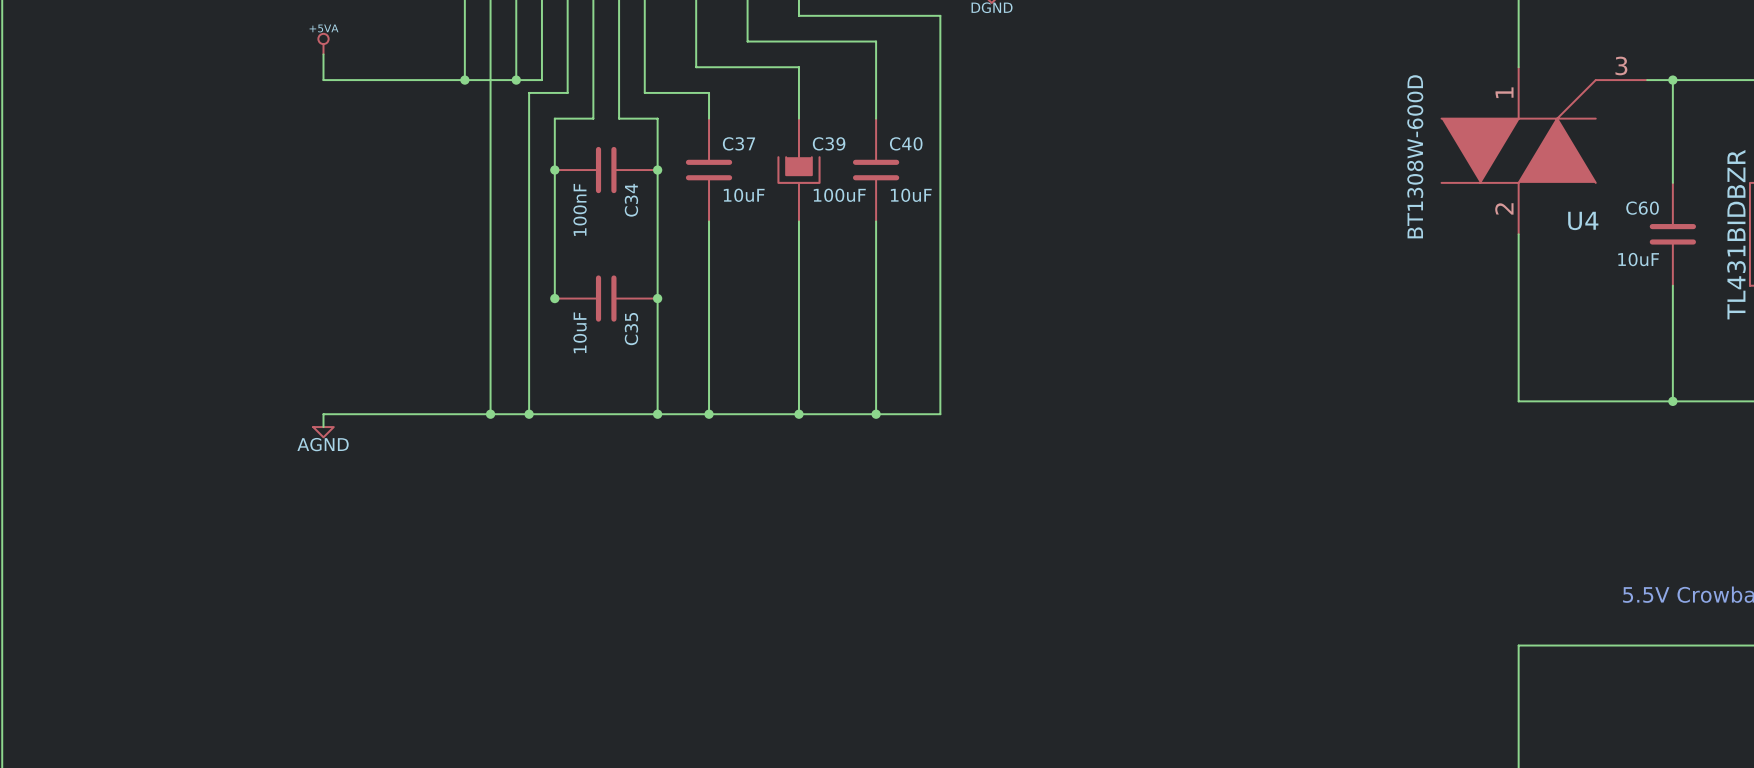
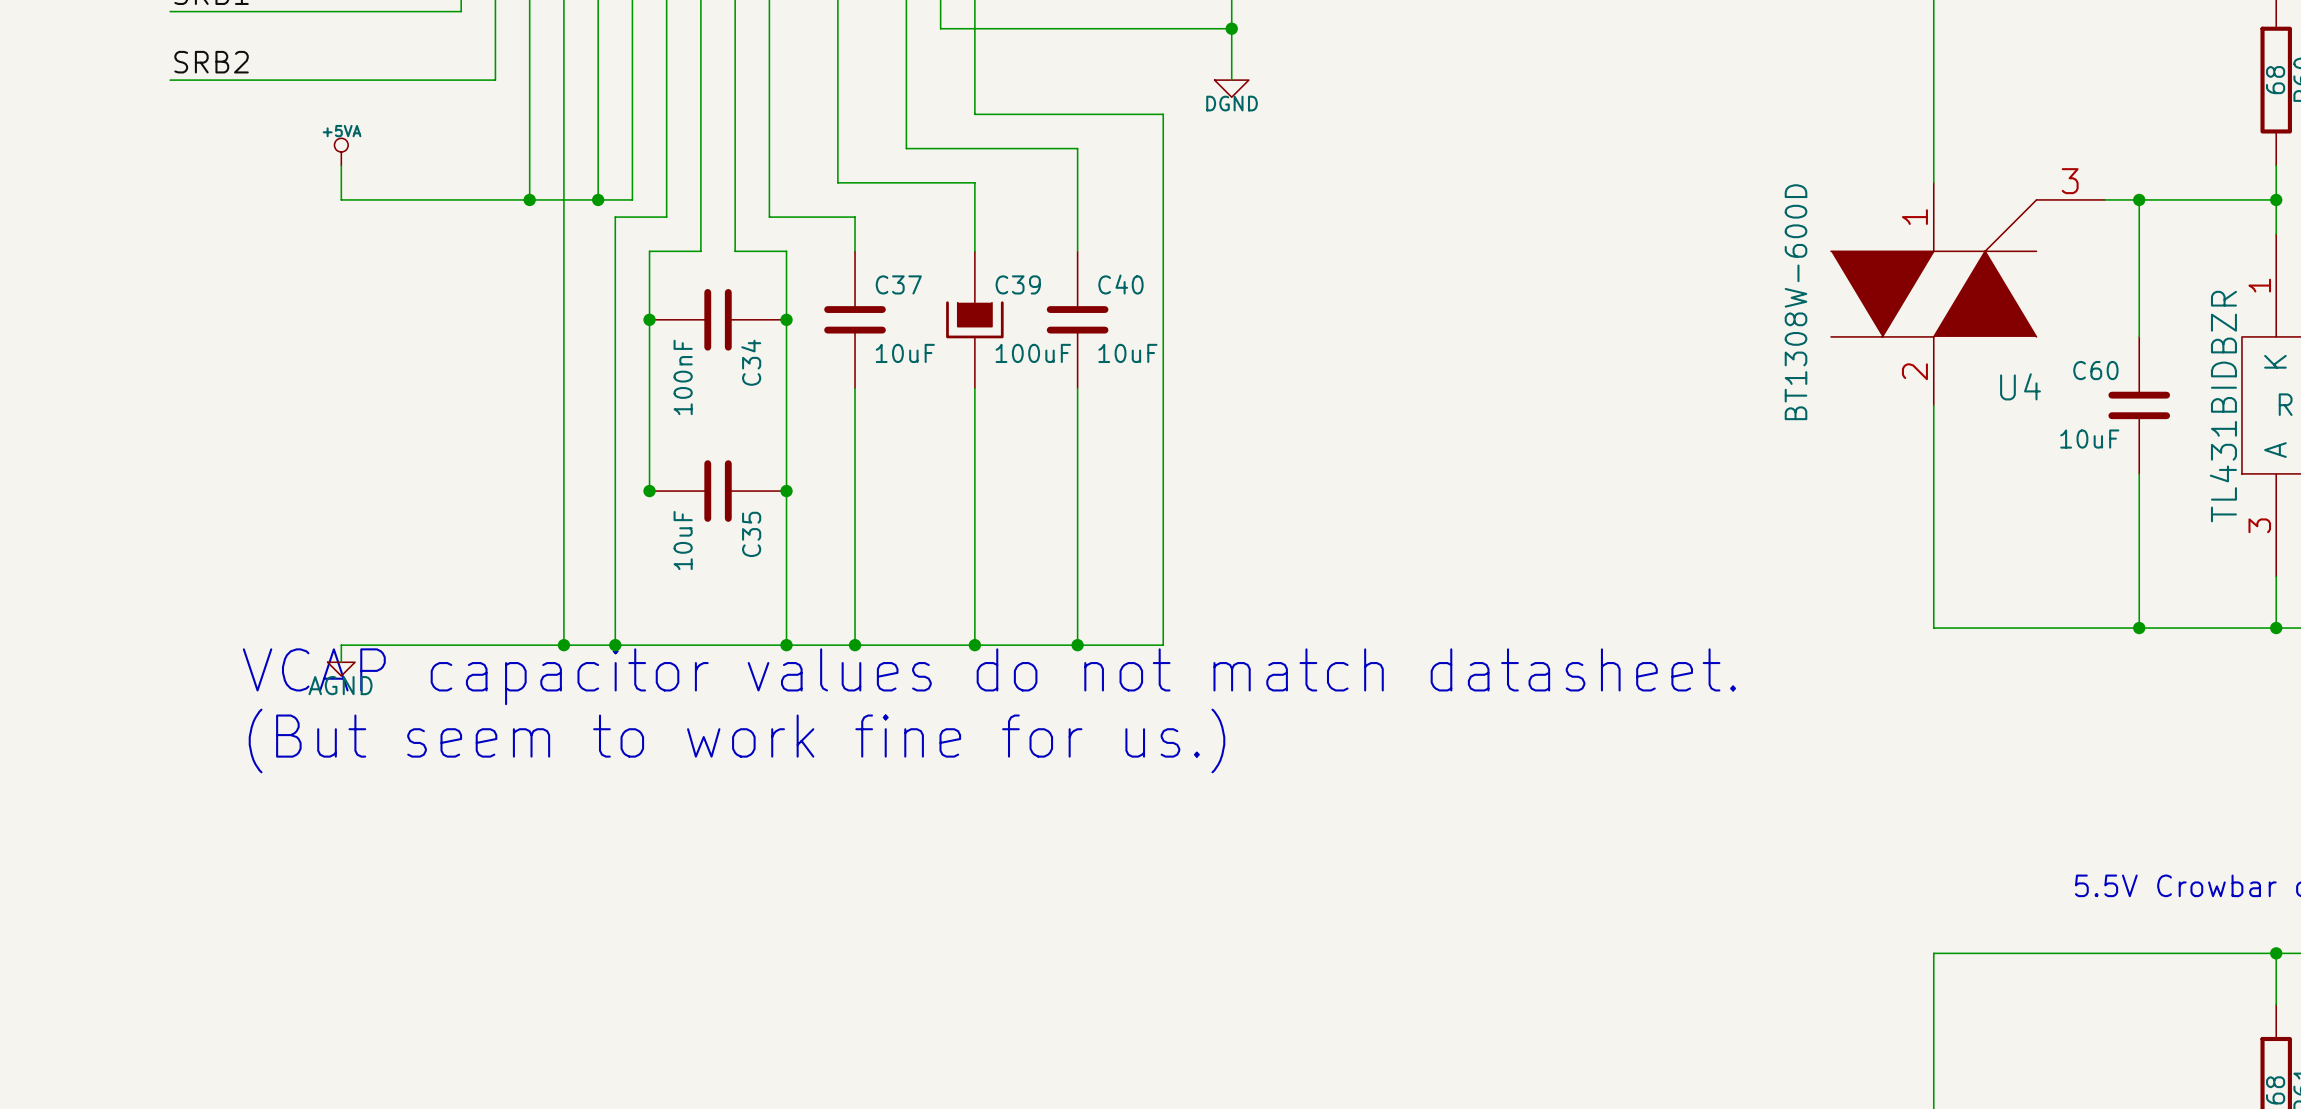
text: none -> VCAP capacitor values do not match datasheet. (989, 676)
text: none -> (But seem to work fine for us.) (736, 740)

